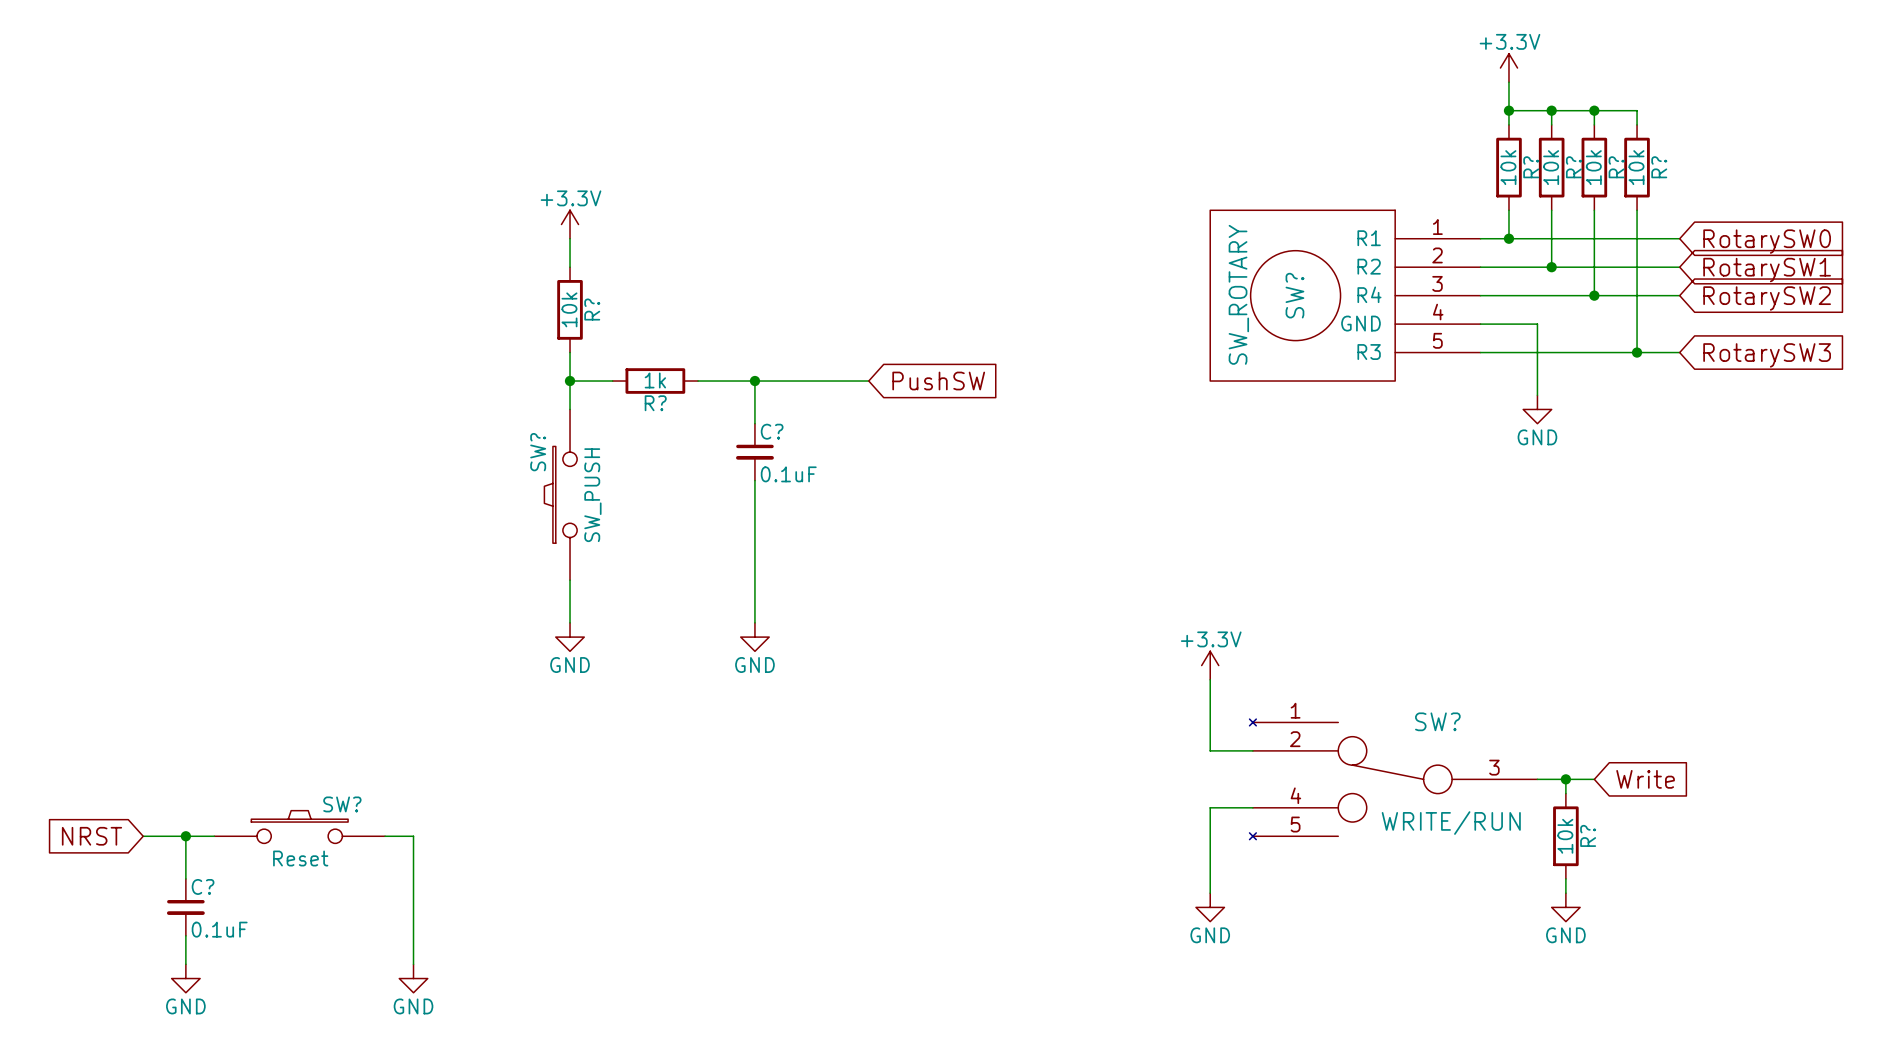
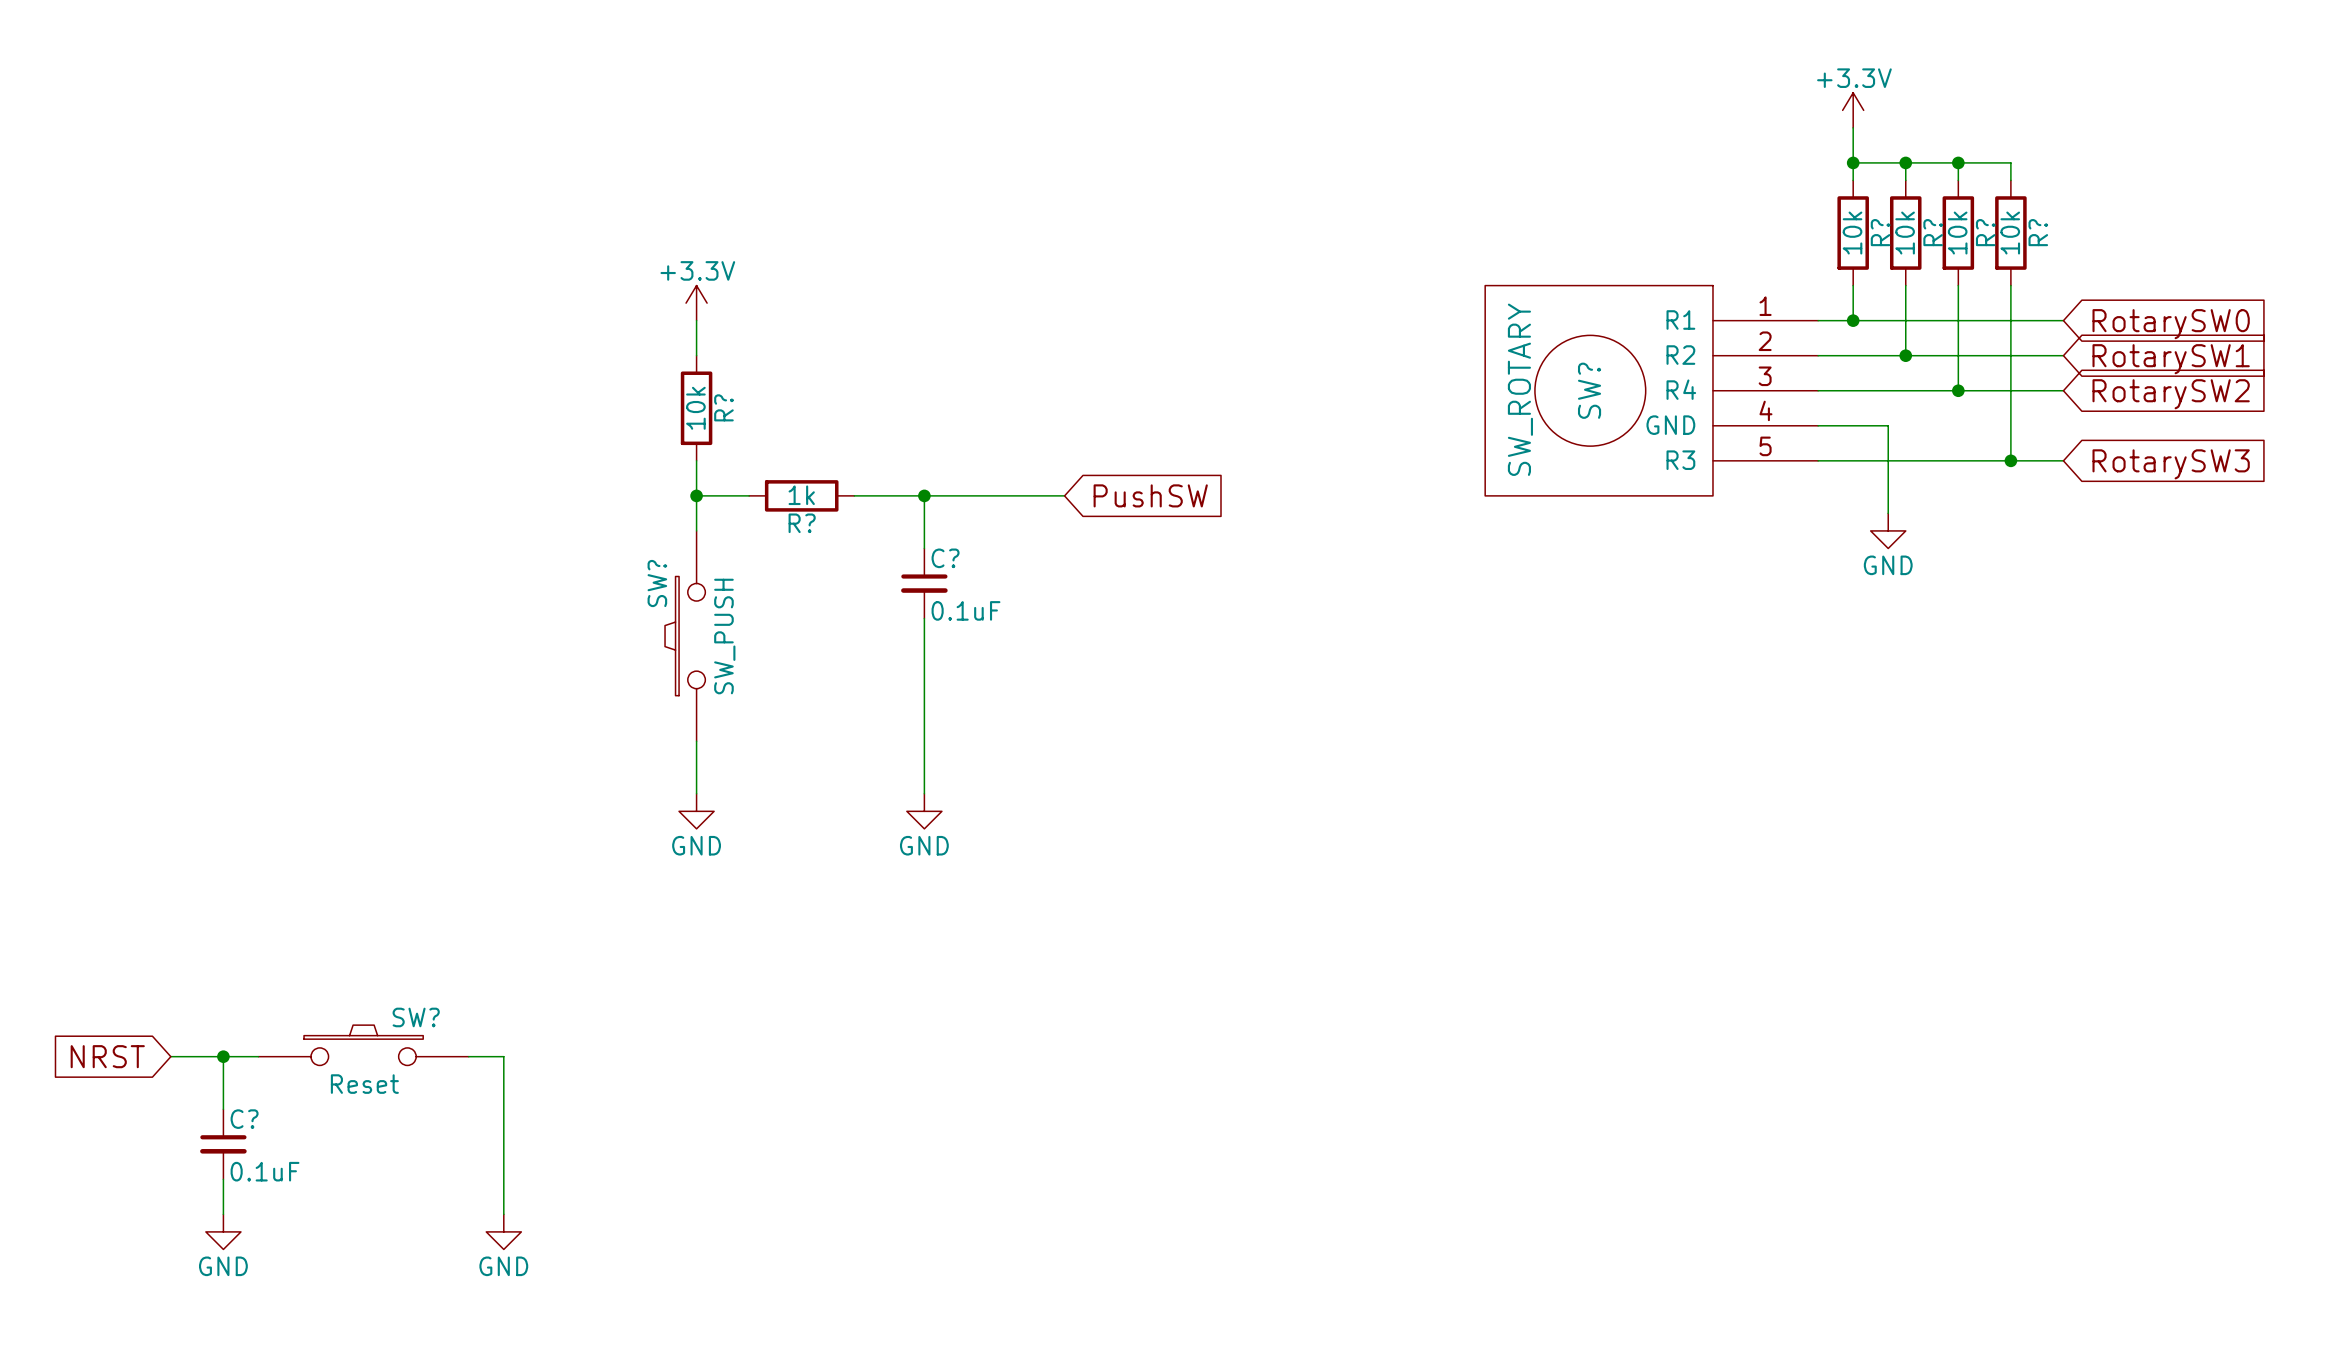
power symbol: +3.3V (1210, 665) -> none
wire: (1210, 679) (1210, 750) (1252, 750) -> none
SW?: WRITE/RUN (1393, 779) -> none
wire: (1537, 779) (1594, 779) -> none
wire: (1565, 779) (1565, 793) -> none
junction: (1565, 779) -> none
global label: Write (1645, 779) -> none
wire: (1252, 807) (1210, 807) (1210, 893) -> none
R?: 10k (1565, 836) -> none
wire: (1565, 878) (1565, 893) -> none
power symbol: GND (1210, 907) -> none
power symbol: GND (1565, 907) -> none

